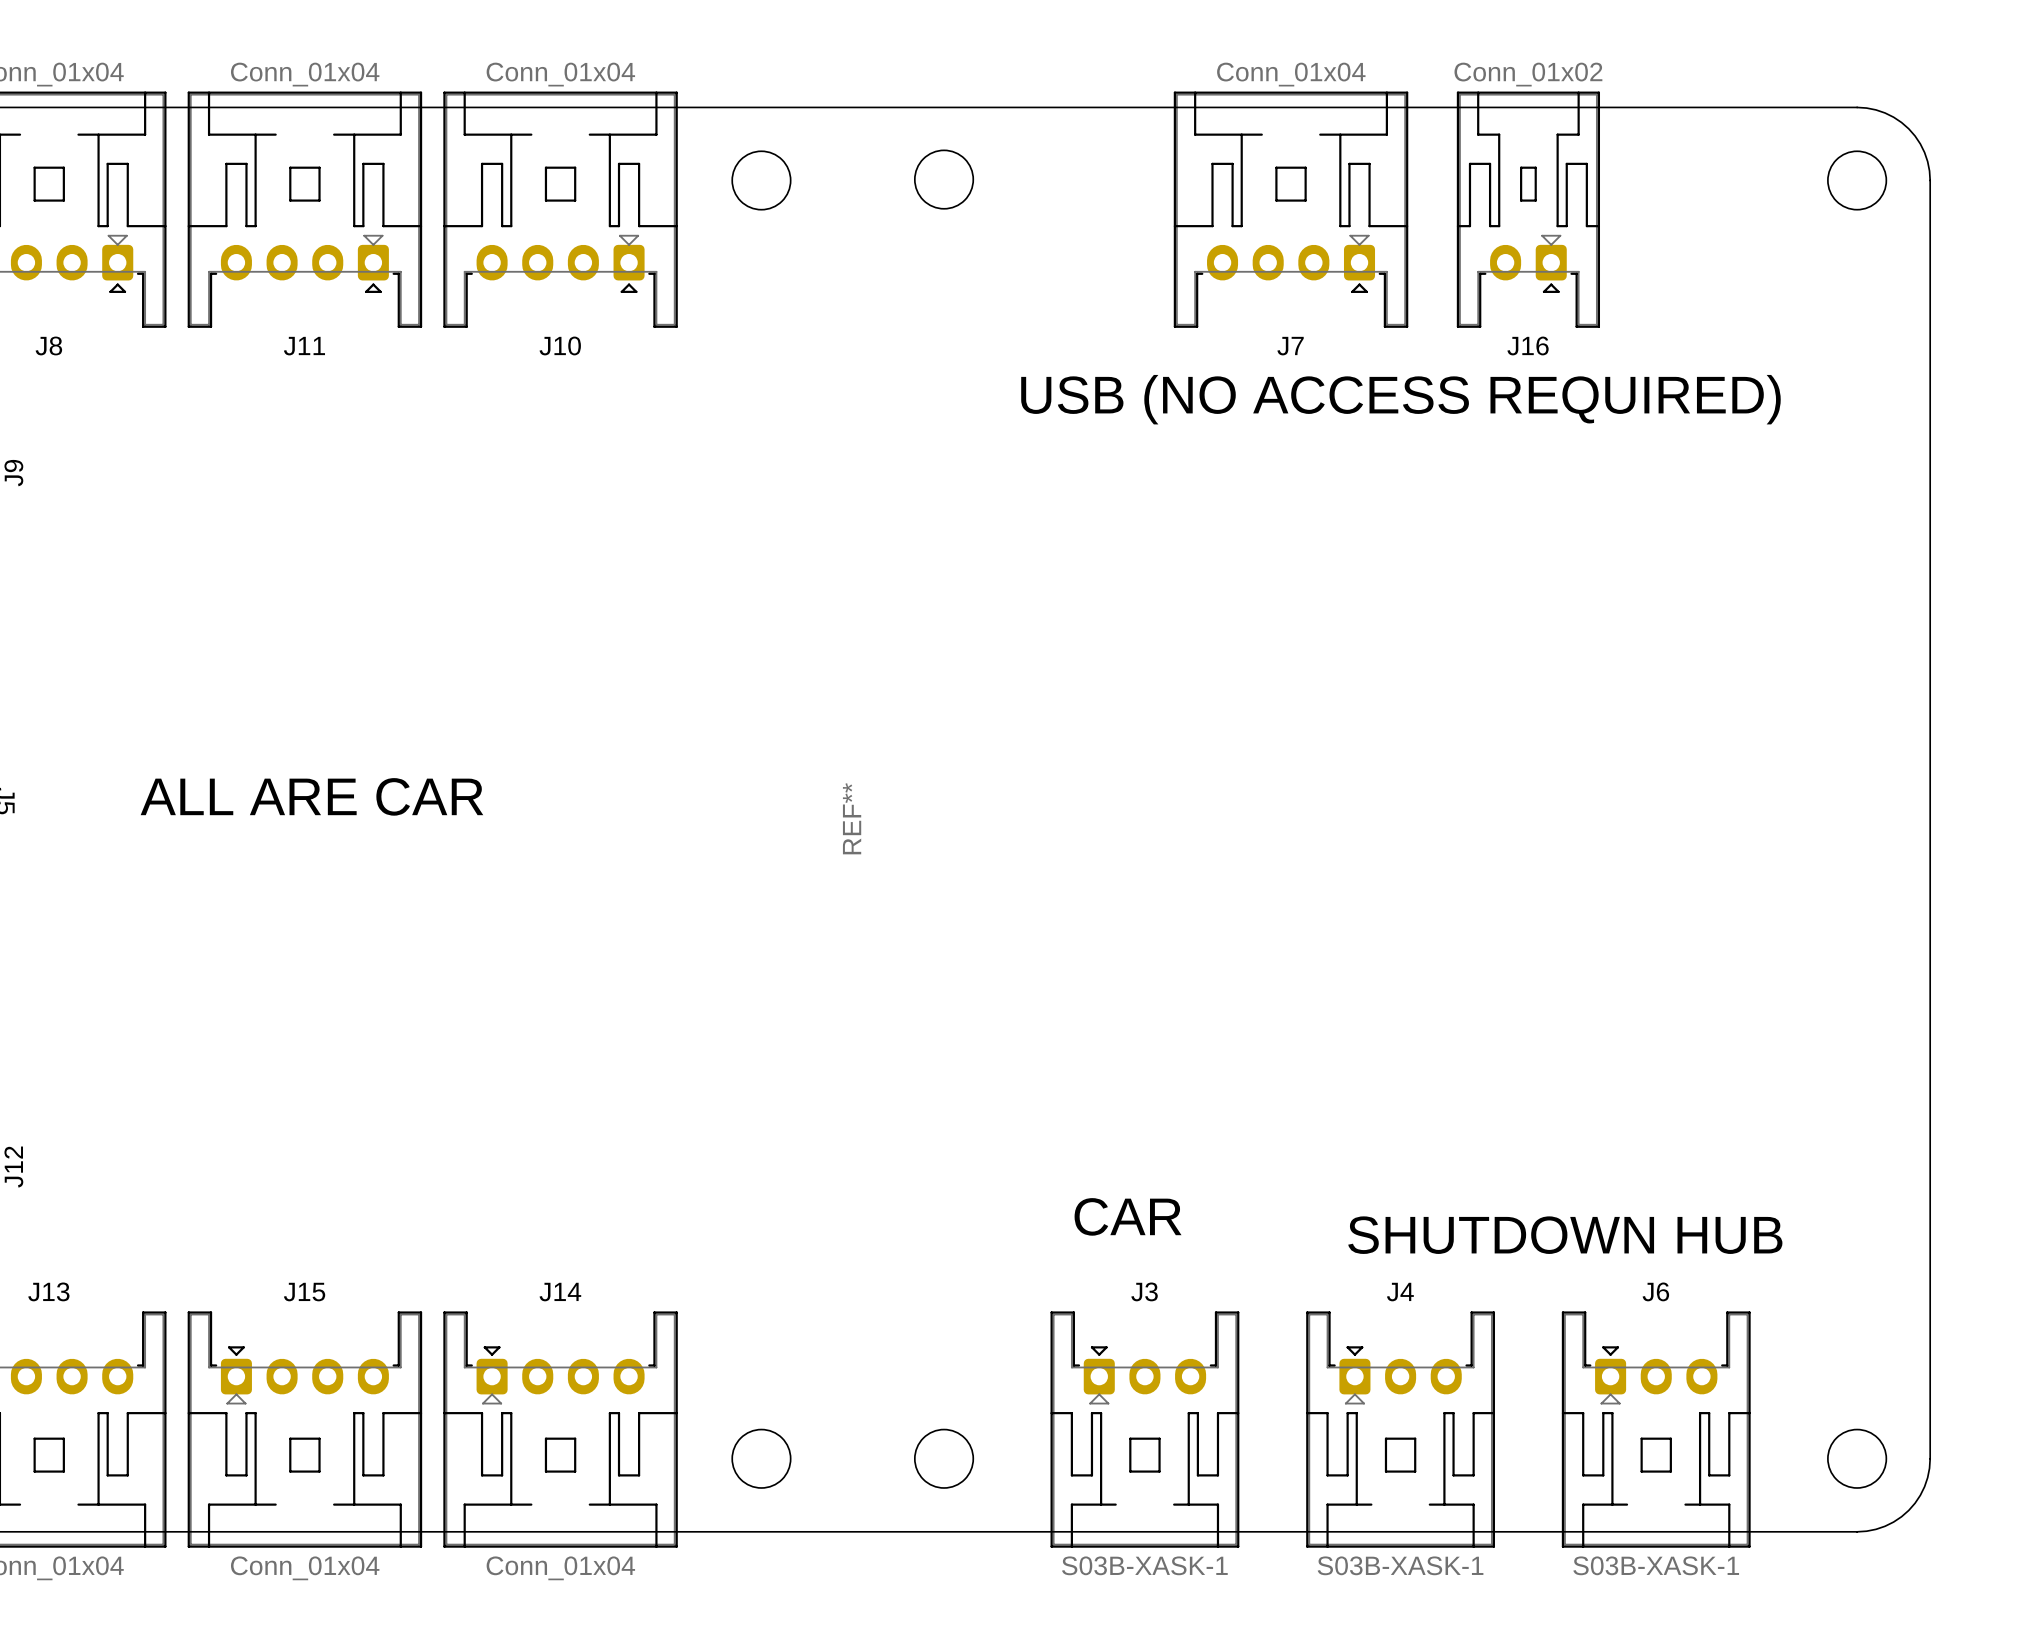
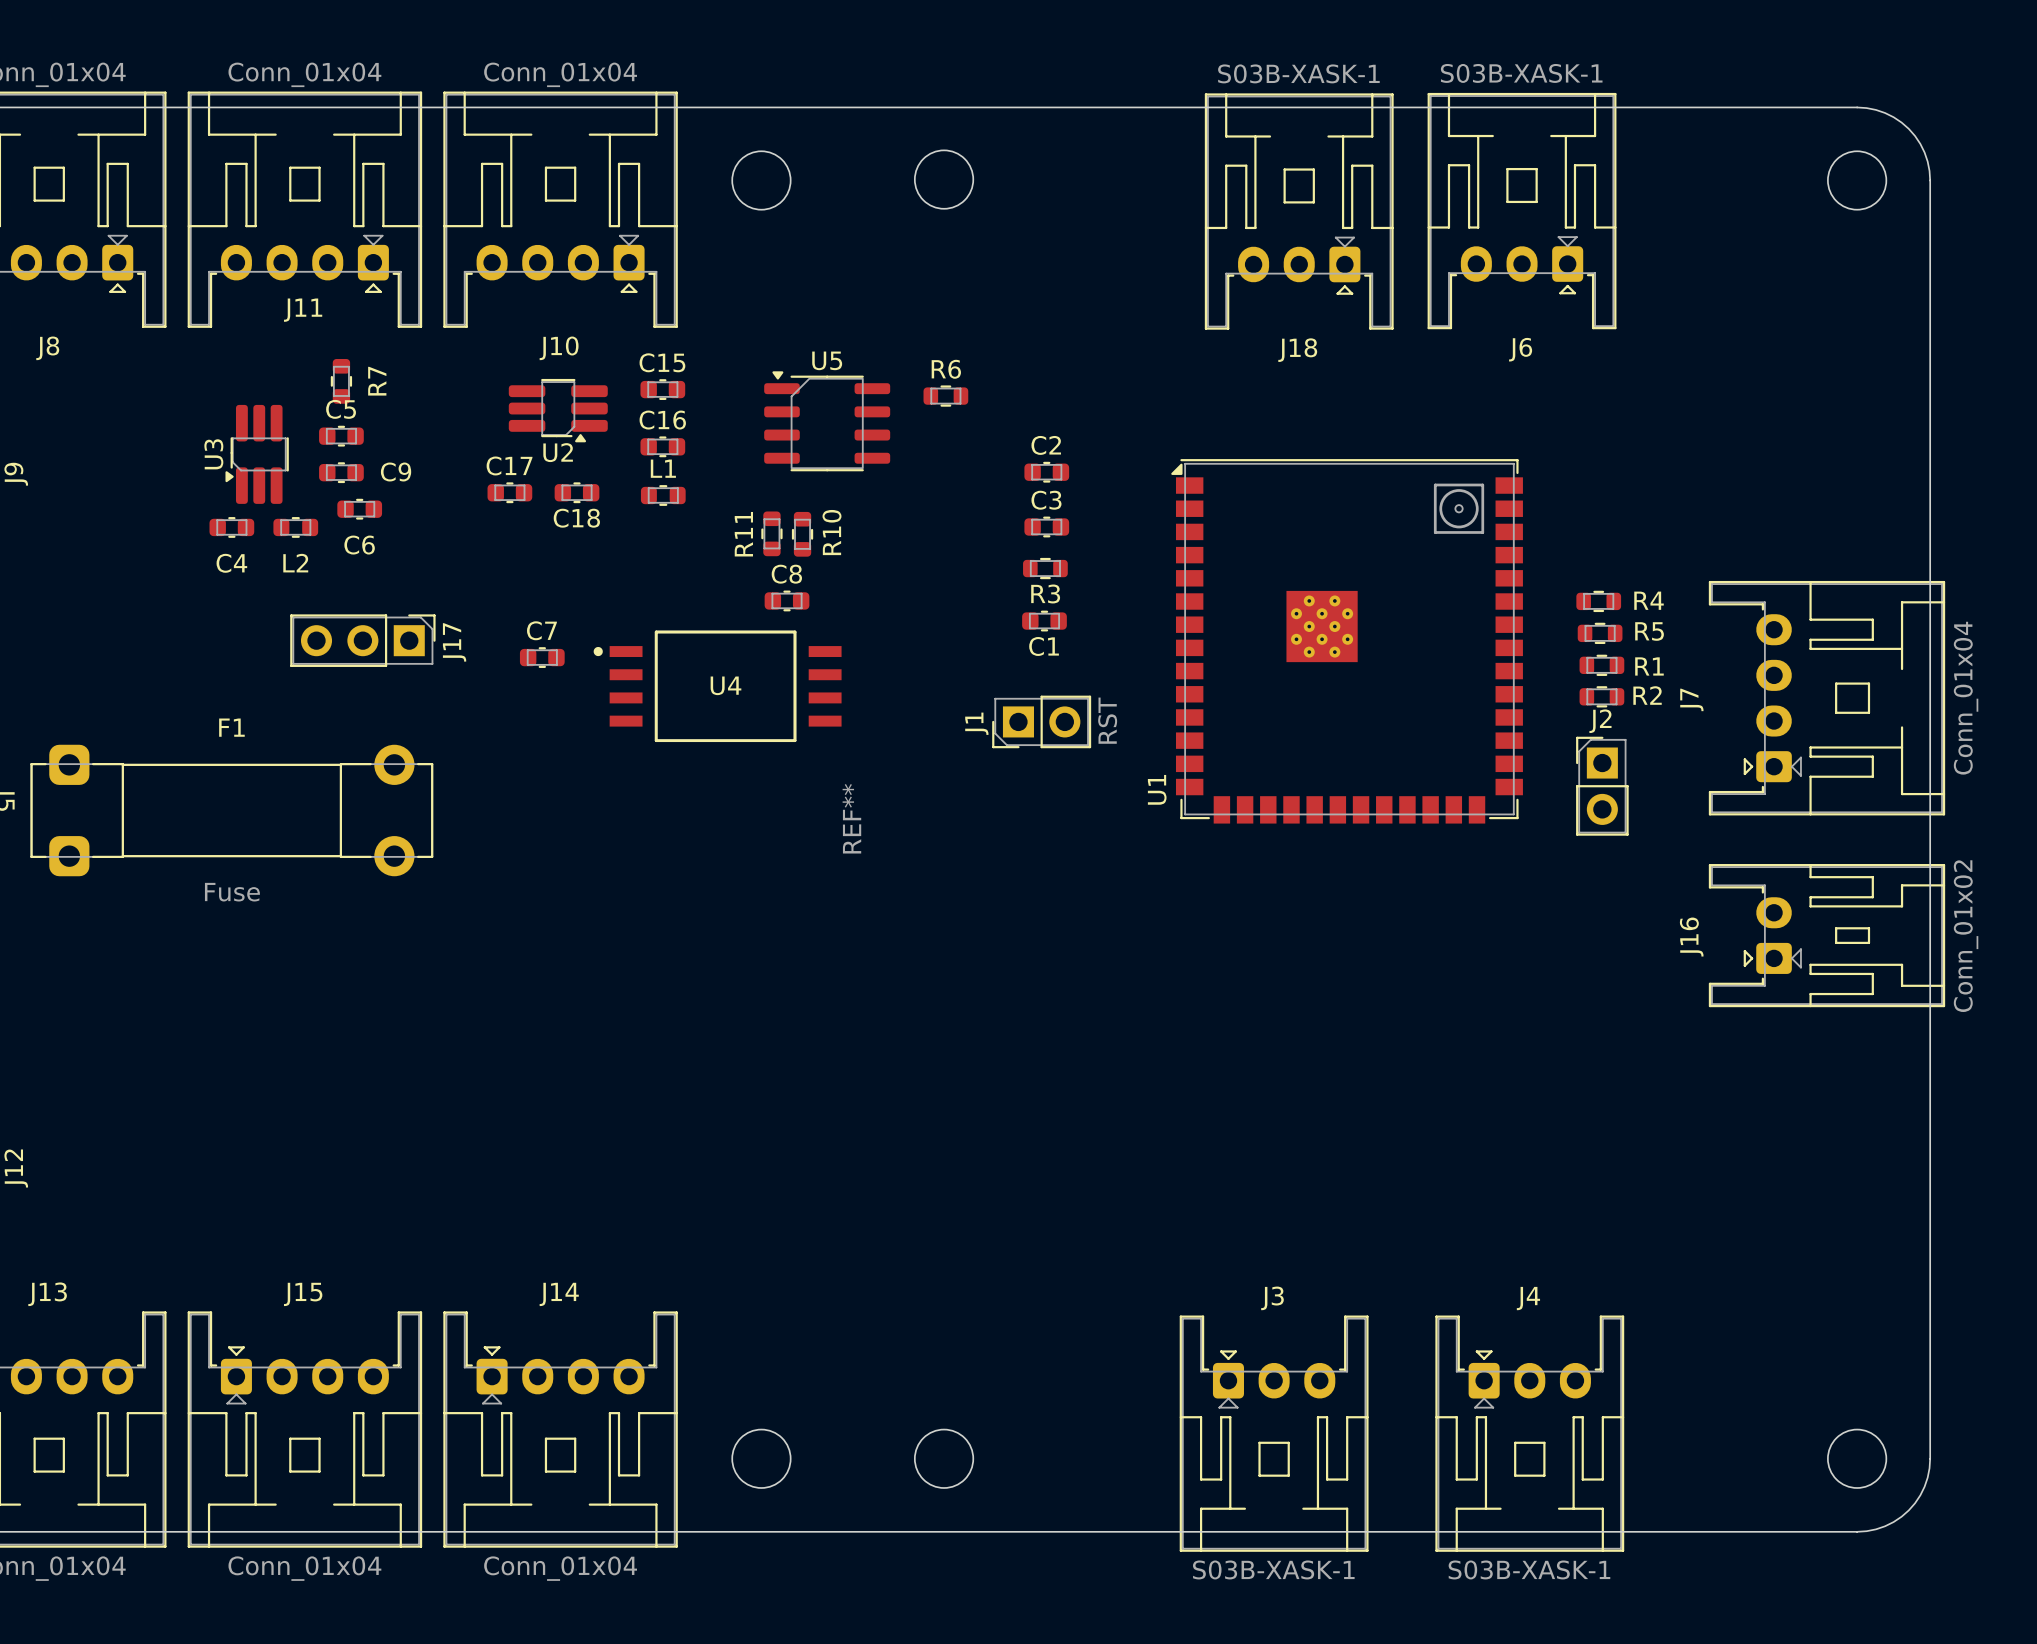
J7 rotation: 0° (1291, 209) -> 90° clockwise (1826, 698)
J7 position: (1291, 209) -> (1826, 698)
J16 rotation: 0° (1528, 209) -> 90° clockwise (1826, 935)
J16 position: (1528, 209) -> (1826, 935)
J18: none -> S03B-XASK-1 (1299, 211)
J11 name position: J11 (304, 346) -> J11 (303, 310)
R7: none -> (341, 381)
C15: none -> (662, 389)
R6: none -> (945, 396)
text: USB (NO ACCESS REQUIRED) (1400, 399) -> none
U2: none -> (558, 410)
U5: none -> (827, 421)
C5: none -> (341, 436)
C16: none -> (662, 446)
U3: none -> (257, 454)
C9: none -> (341, 472)
C2: none -> (1046, 472)
C17: none -> (509, 492)
C18: none -> (577, 492)
L1: none -> (663, 495)
C6: none -> (359, 509)
C3: none -> (1046, 526)
C4: none -> (231, 527)
L2: none -> (295, 527)
R11: none -> (771, 533)
R10: none -> (802, 534)
R3: none -> (1045, 568)
C8: none -> (787, 600)
R4: none -> (1598, 601)
C1: none -> (1044, 621)
R5: none -> (1600, 633)
J17: none -> (362, 640)
U1: none -> (1347, 641)
C7: none -> (542, 657)
R1: none -> (1601, 665)
U4: none -> (717, 686)
R2: none -> (1601, 696)
J1: none -> RST (1041, 721)
J2: none -> (1602, 786)
text: ALL ARE CAR (311, 796) -> none
F1: none -> Fuse (231, 810)
text: CAR (1128, 1216) -> none
text: SHUTDOWN HUB (1565, 1235) -> none
J3 position: (1144, 1429) -> (1274, 1433)
J4 position: (1400, 1429) -> (1529, 1433)
J6 rotation: 0° (1656, 1429) -> 180° (1522, 211)
J6 position: (1656, 1429) -> (1522, 211)

